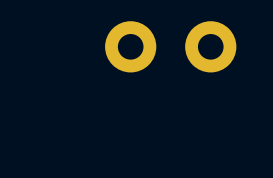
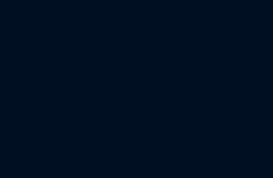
part: (170, 46) -> none

